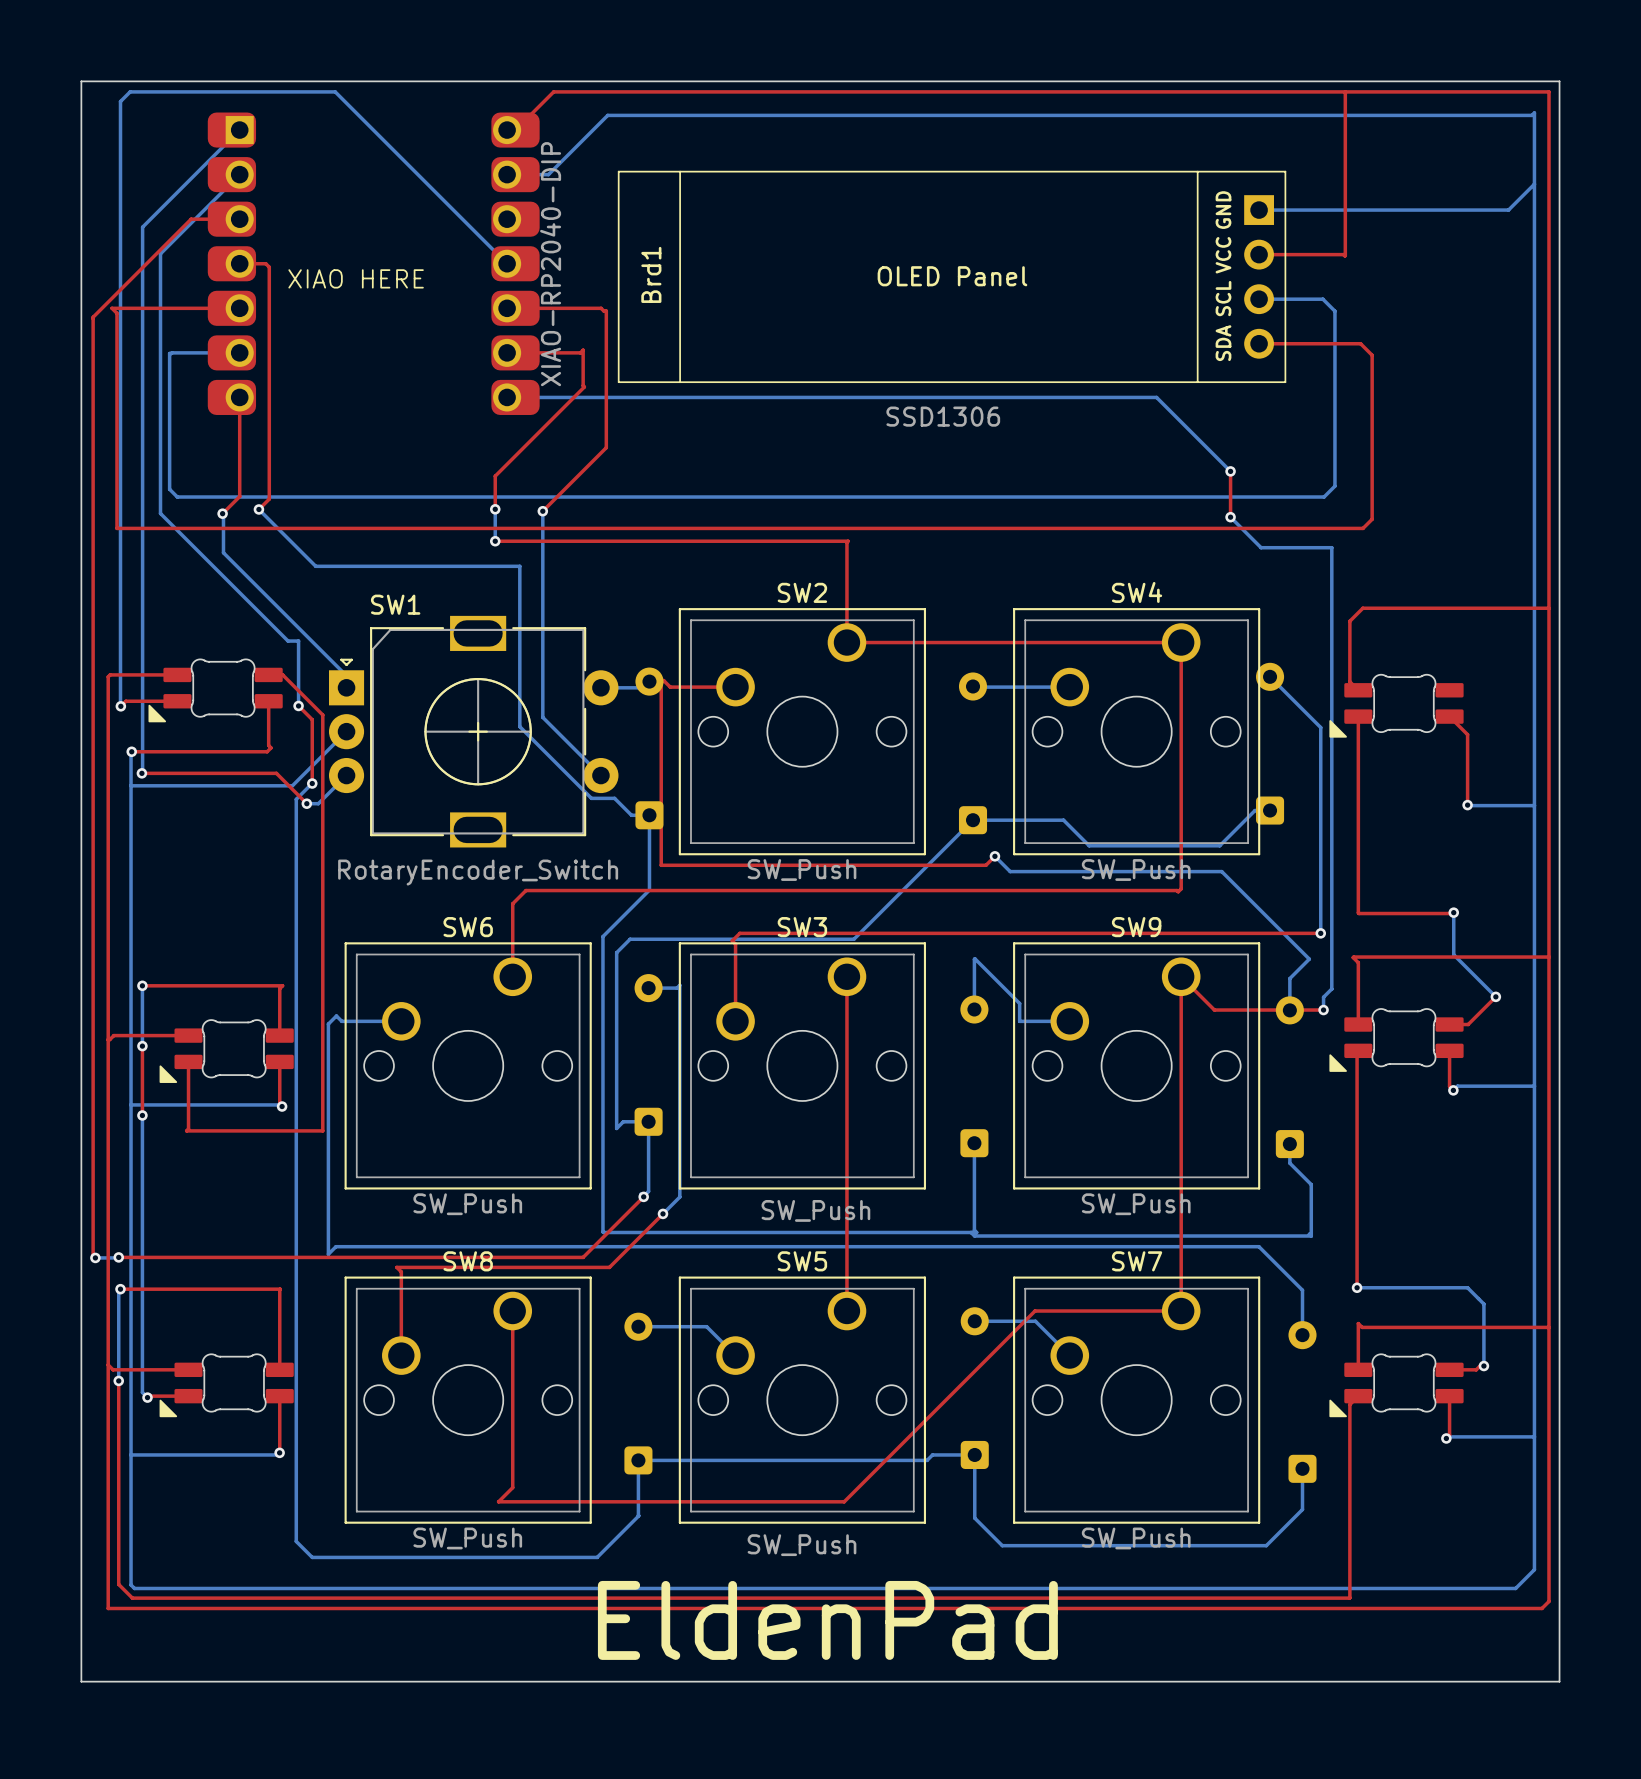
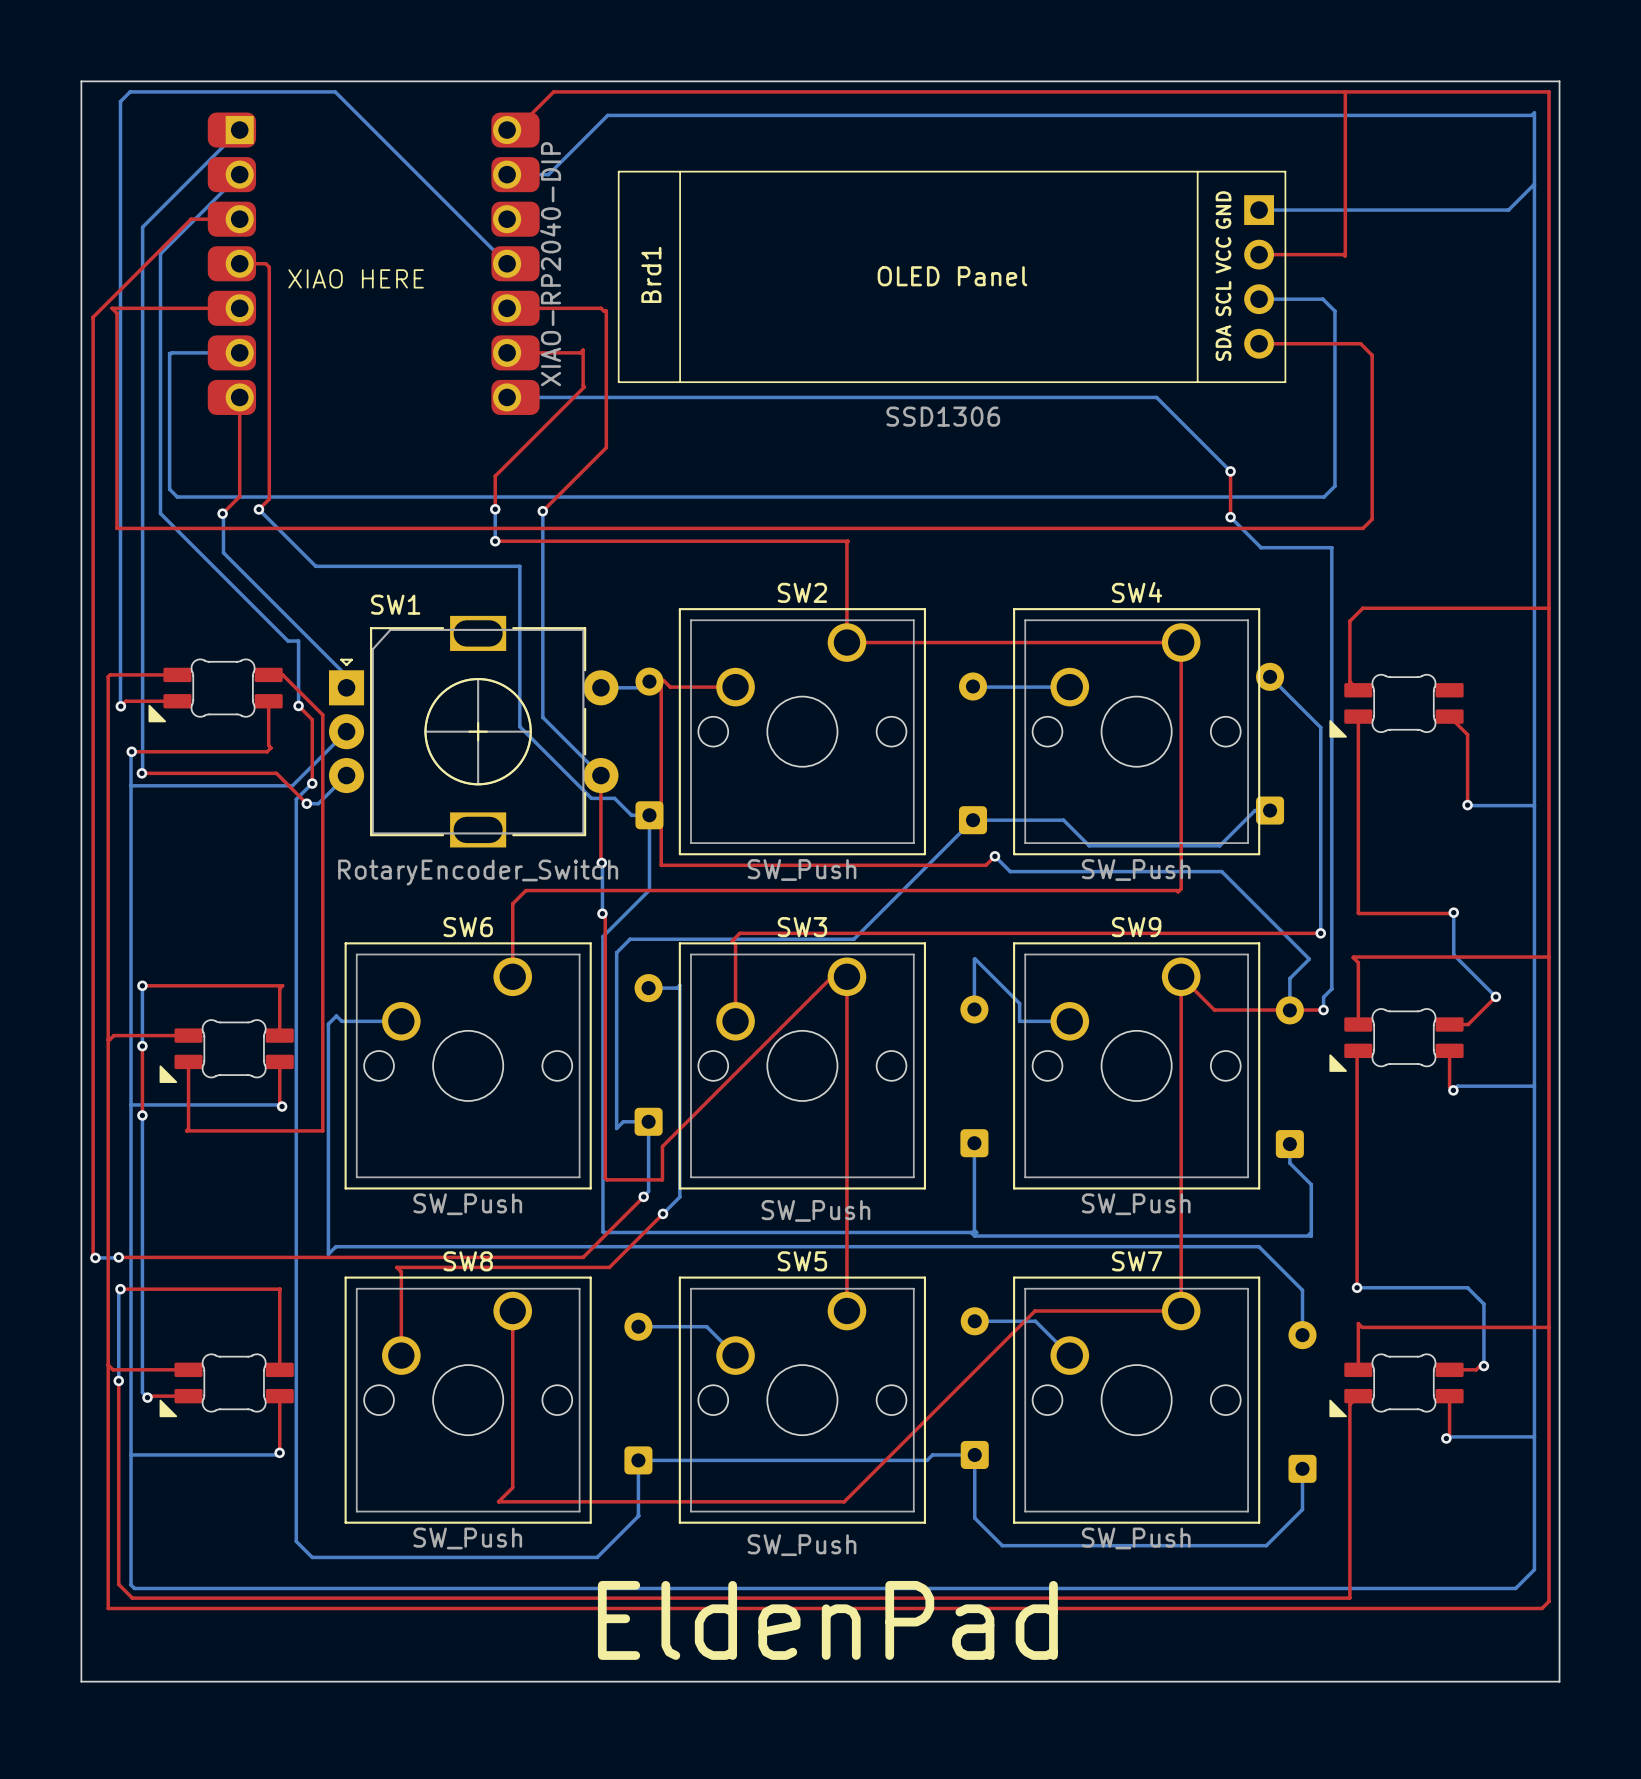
top track: none -> (600, 775) (601, 863)
bottom track: none -> (601, 863) (602, 913)
via: none -> (601, 863)
top track: none -> (602, 913) (605, 916) (605, 1178) (607, 1179) (662, 1179) (662, 1146) (832, 976) (846, 976)
via: none -> (602, 913)

